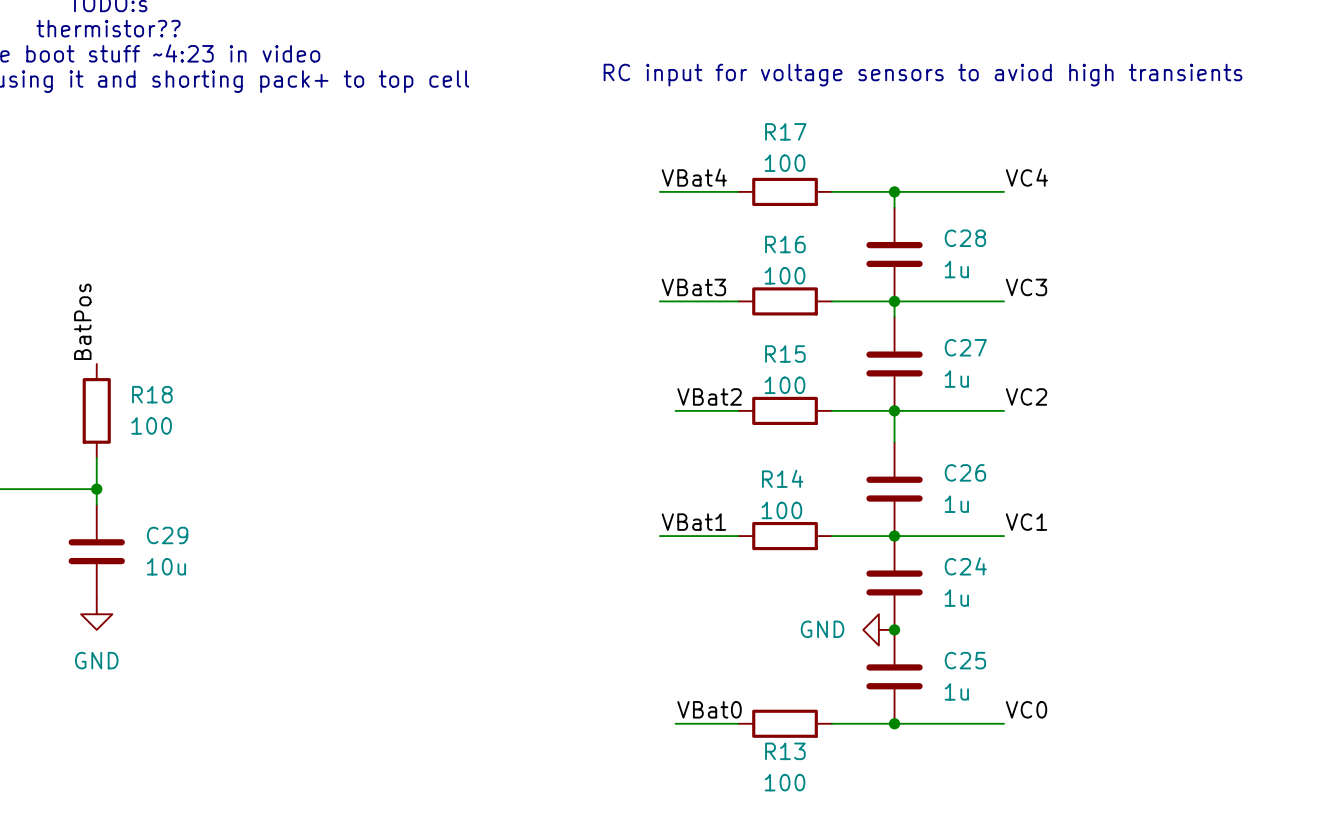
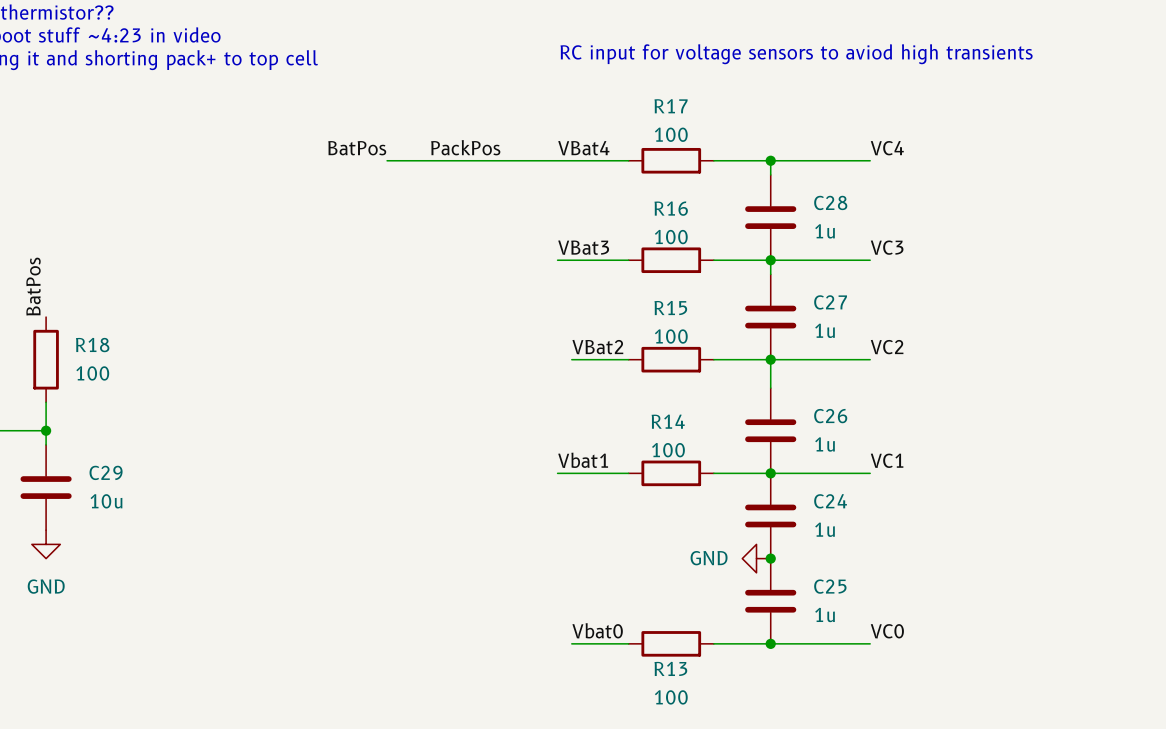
label: none -> BatPos (357, 148)
label: none -> PackPos (465, 147)
wire: none -> (387, 160) (557, 160)
label: VBat1 (693, 522) -> Vbat1 (583, 460)
label: VBat0 (709, 709) -> Vbat0 (597, 630)

